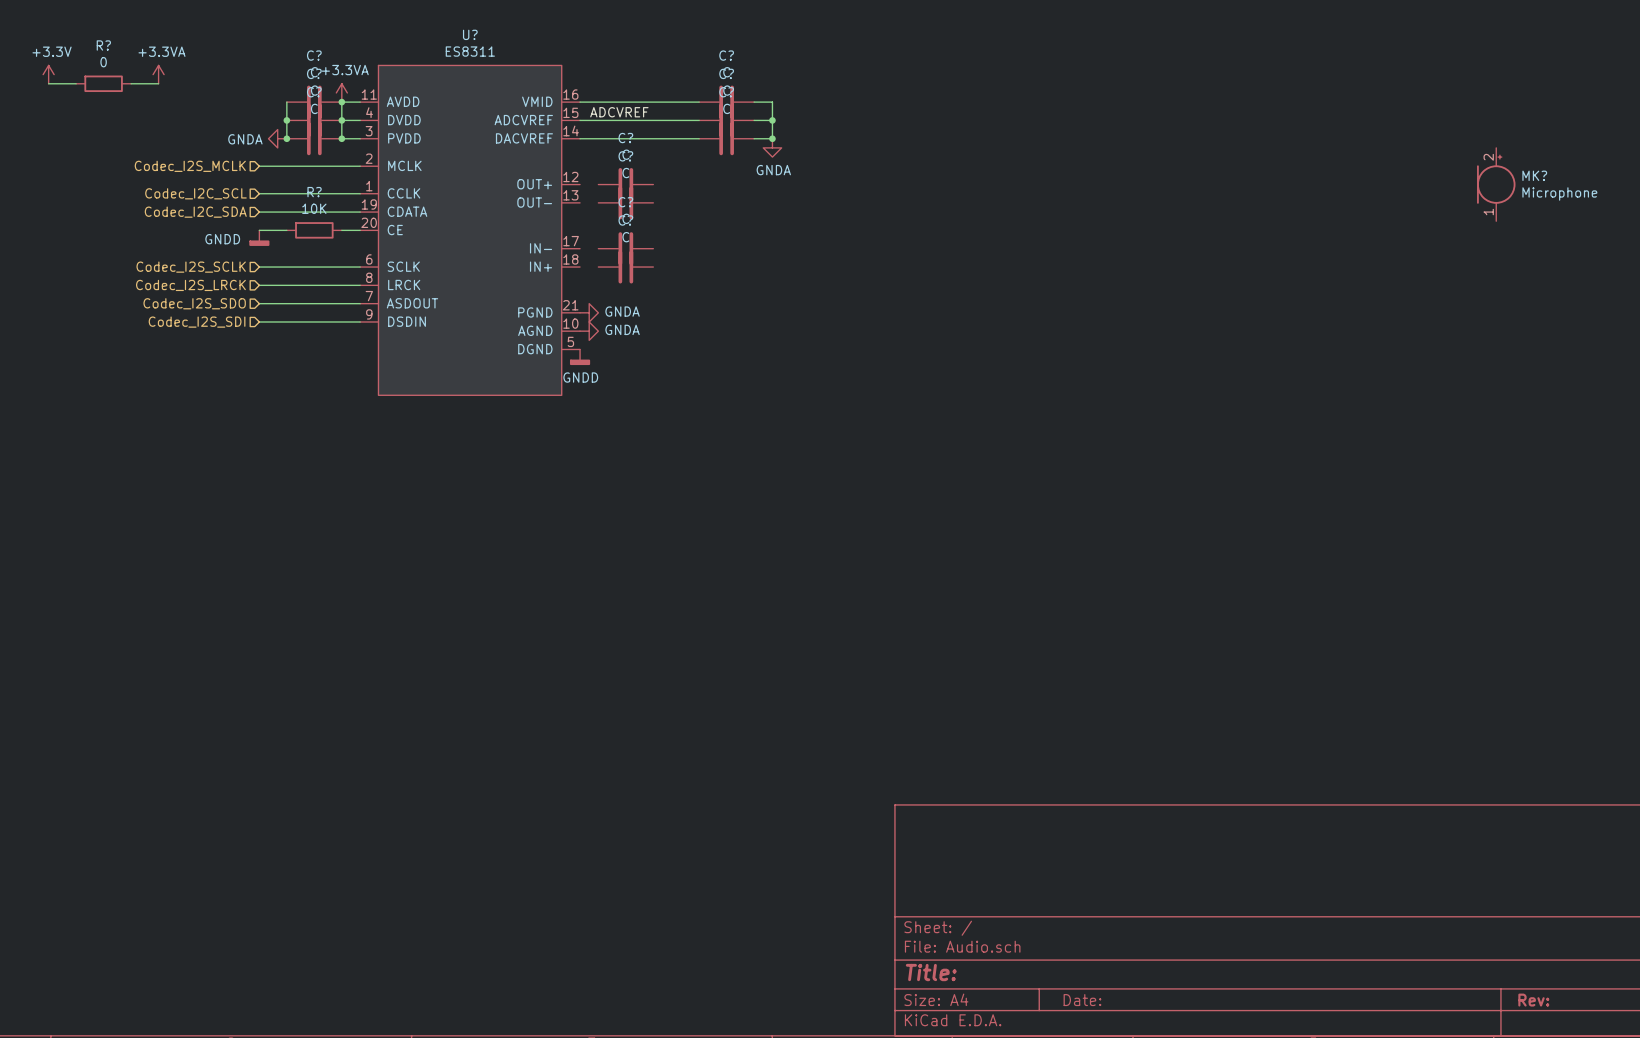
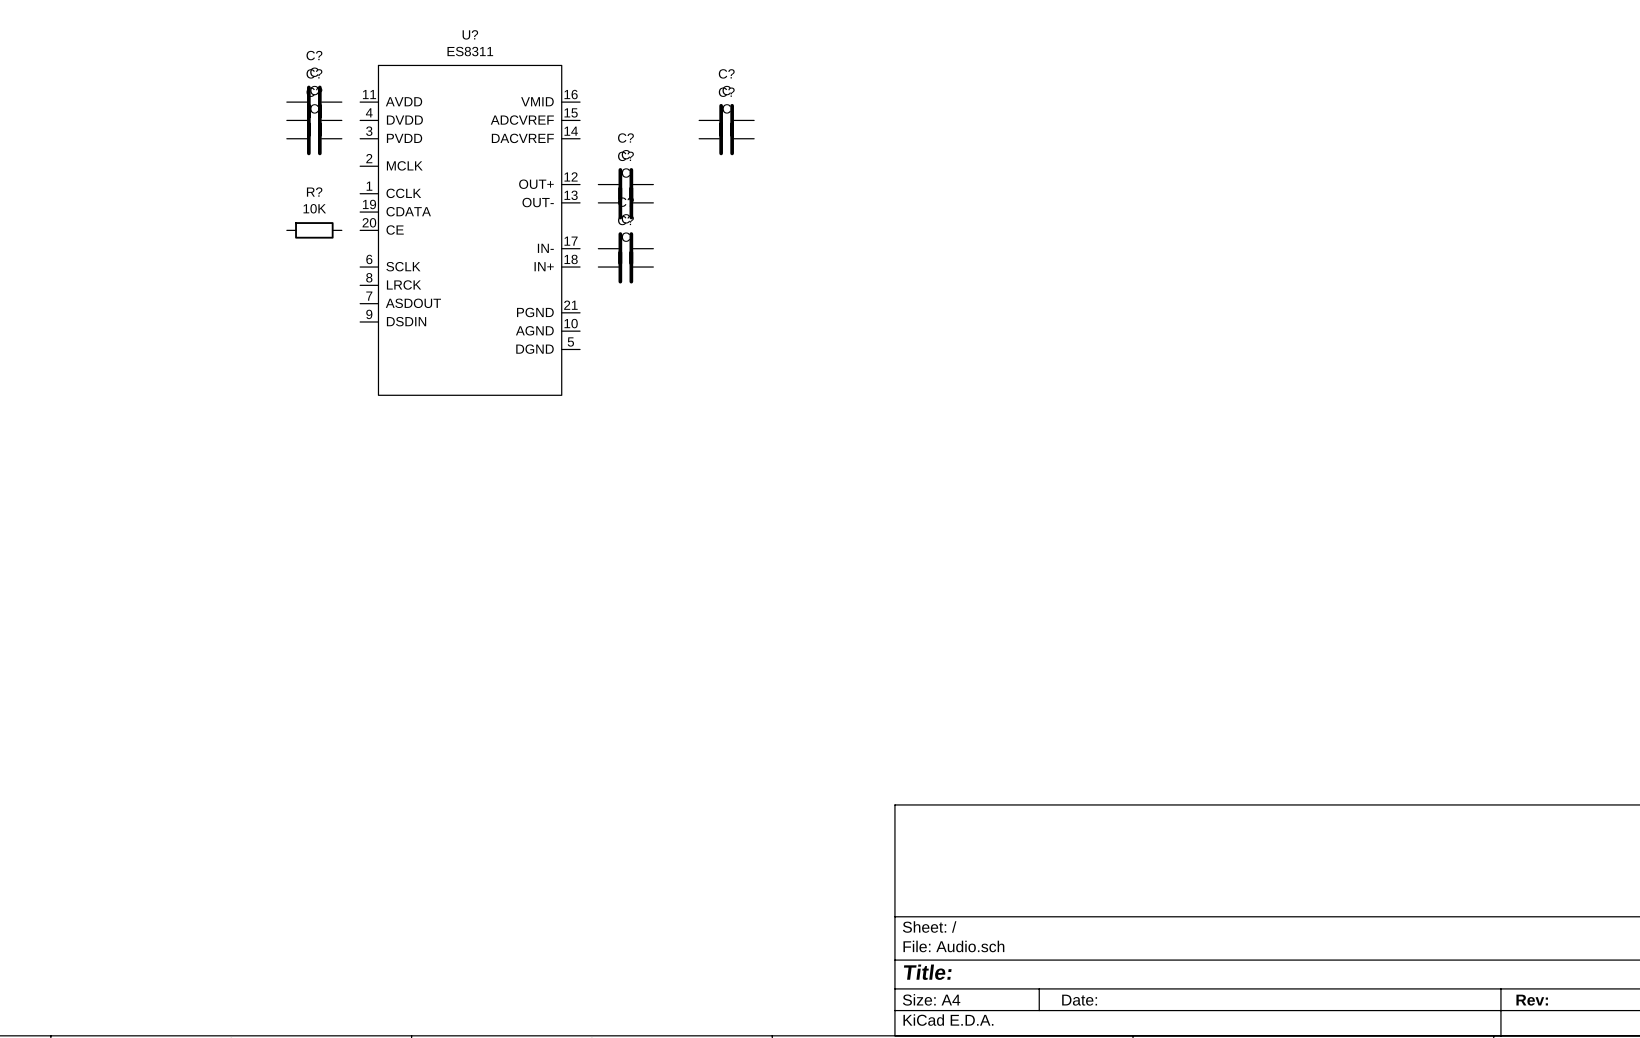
power symbol: +3.3V (48, 74) -> none
power symbol: +3.3VA (158, 74) -> none
wire: (48, 83) (76, 83) -> none
R?: 0 (103, 83) -> none
wire: (131, 83) (158, 83) -> none
power symbol: +3.3VA (341, 92) -> none
wire: (286, 102) (286, 138) -> none
junction: (341, 102) -> none
wire: (360, 102) (341, 102) (341, 138) (360, 138) -> none
wire: (580, 102) (699, 102) -> none
C?: C (726, 102) -> none
wire: (754, 102) (772, 102) (772, 138) (754, 138) -> none
label: ADCVREF (619, 112) -> none
junction: (286, 120) -> none
wire: (341, 120) (360, 120) -> none
junction: (341, 120) -> none
wire: (580, 120) (699, 120) -> none
wire: (754, 120) (772, 120) -> none
junction: (772, 120) -> none
power symbol: GNDA (277, 138) -> none
junction: (286, 138) -> none
junction: (341, 138) -> none
wire: (580, 138) (699, 138) -> none
junction: (772, 138) -> none
power symbol: GNDA (772, 147) -> none
hierarchical label: Codec_I2S_MCLK (190, 166) -> none
wire: (259, 166) (360, 166) -> none
MK?: Microphone (1496, 184) -> none
hierarchical label: Codec_I2C_SCL (195, 193) -> none
wire: (259, 193) (360, 193) -> none
hierarchical label: Codec_I2C_SDA (195, 212) -> none
wire: (259, 212) (360, 212) -> none
wire: (259, 230) (286, 230) -> none
wire: (341, 230) (360, 230) -> none
power symbol: GNDD (259, 238) -> none
hierarchical label: Codec_I2S_SCLK (191, 267) -> none
wire: (259, 267) (360, 267) -> none
hierarchical label: Codec_I2S_LRCK (190, 285) -> none
wire: (259, 285) (360, 285) -> none
hierarchical label: Codec_I2S_SDO (194, 303) -> none
wire: (259, 303) (360, 303) -> none
power symbol: GNDA (589, 312) -> none
wire: (259, 321) (360, 321) -> none
hierarchical label: Codec_I2S_SDI (197, 322) -> none
power symbol: GNDA (589, 331) -> none
power symbol: GNDD (580, 357) -> none

